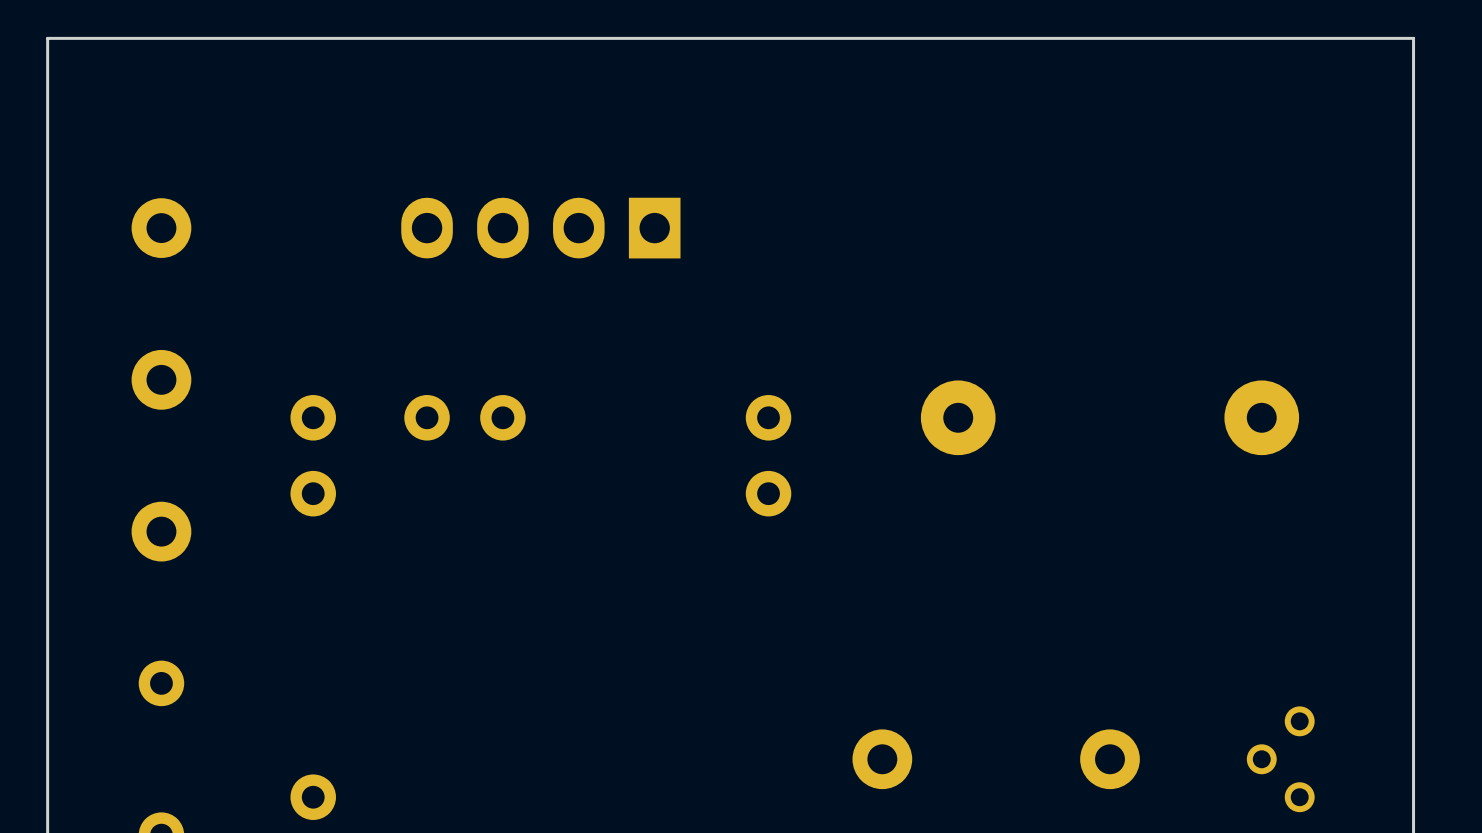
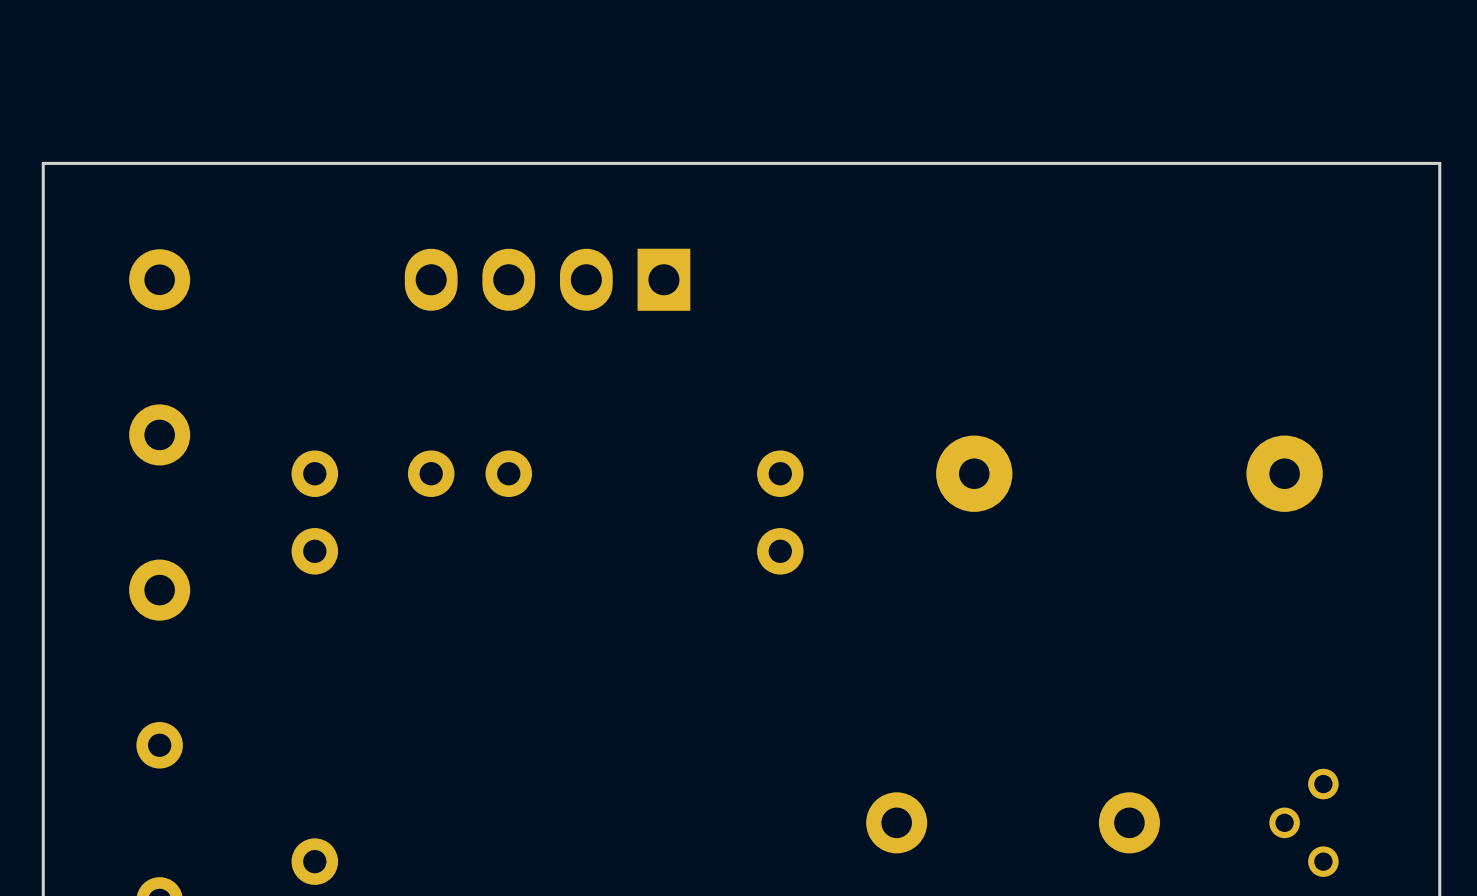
board edge: (1413, 114) (1413, 38) (47, 38) (47, 114) -> (1439, 163) (43, 163)

